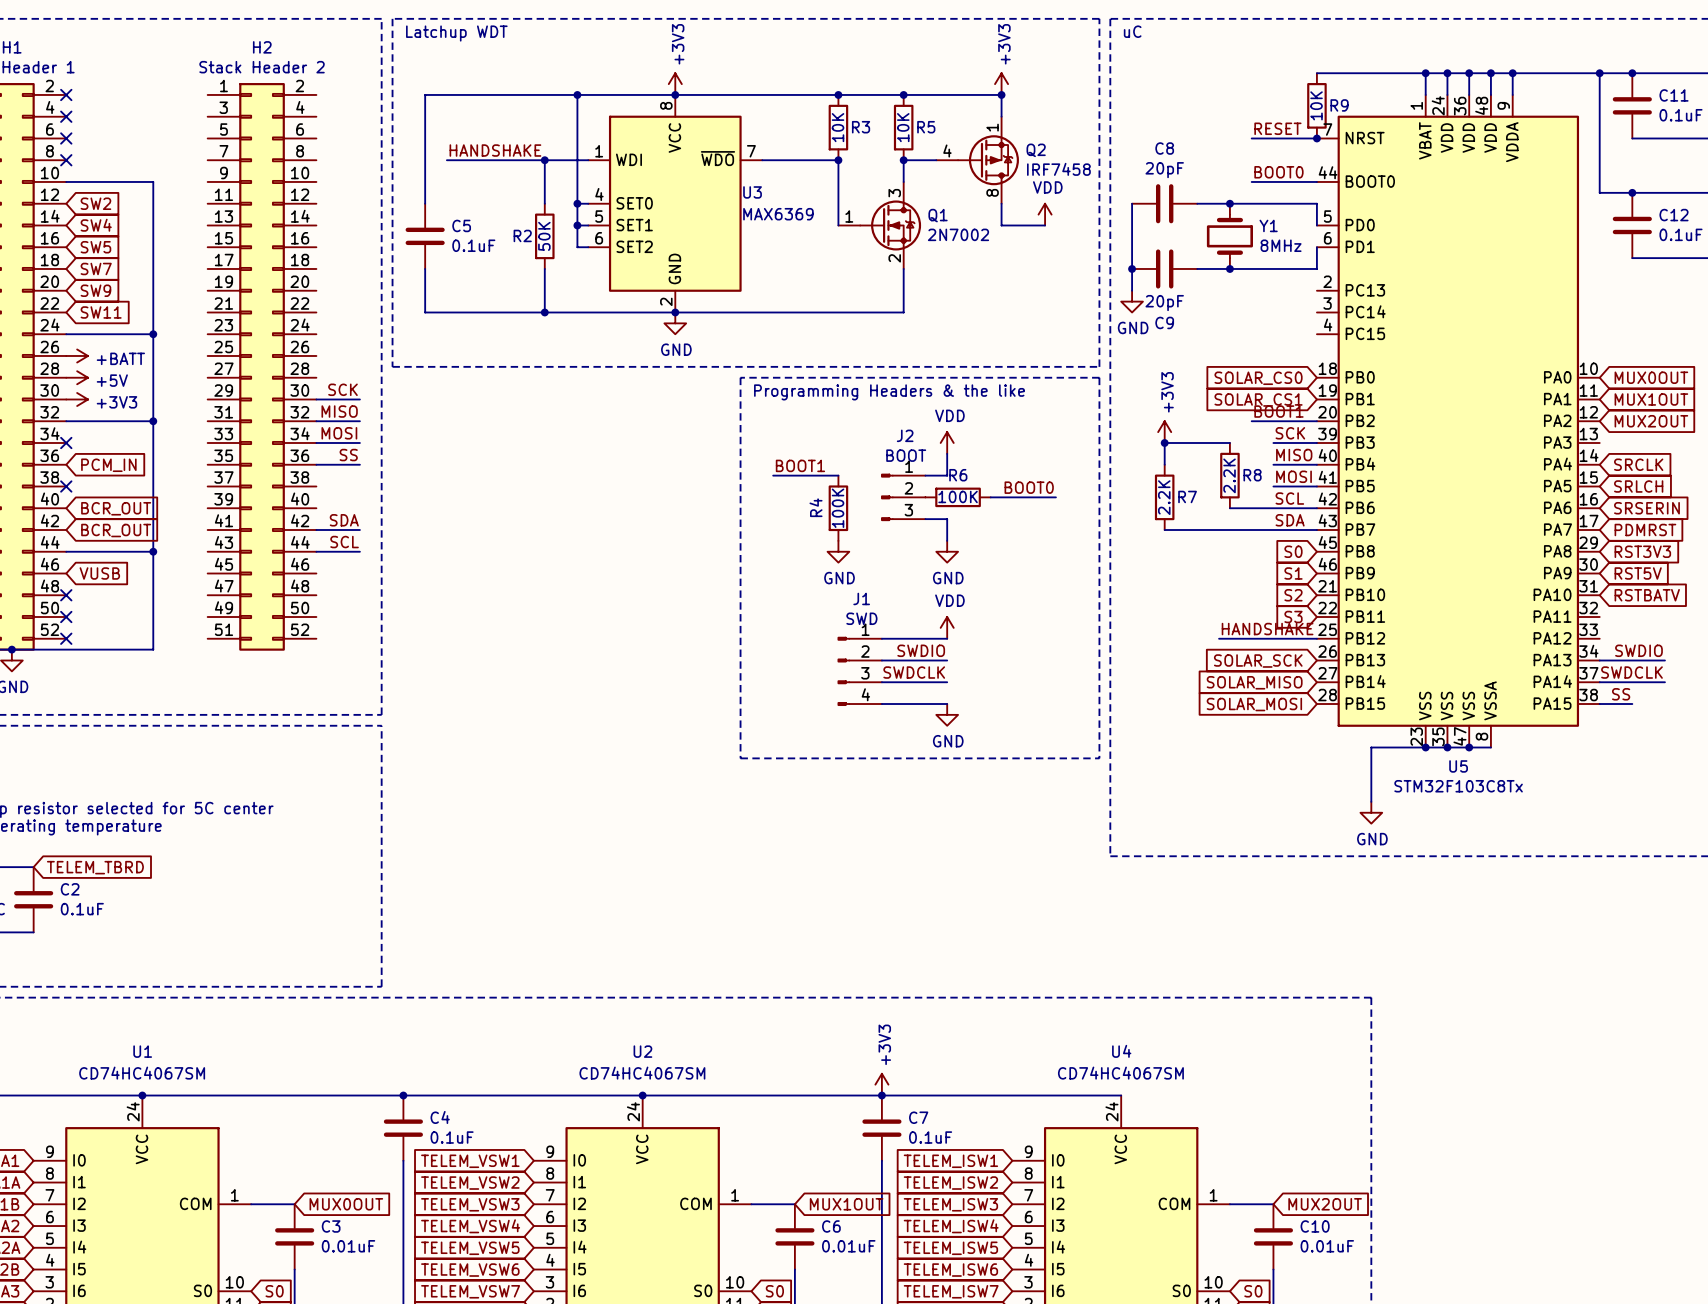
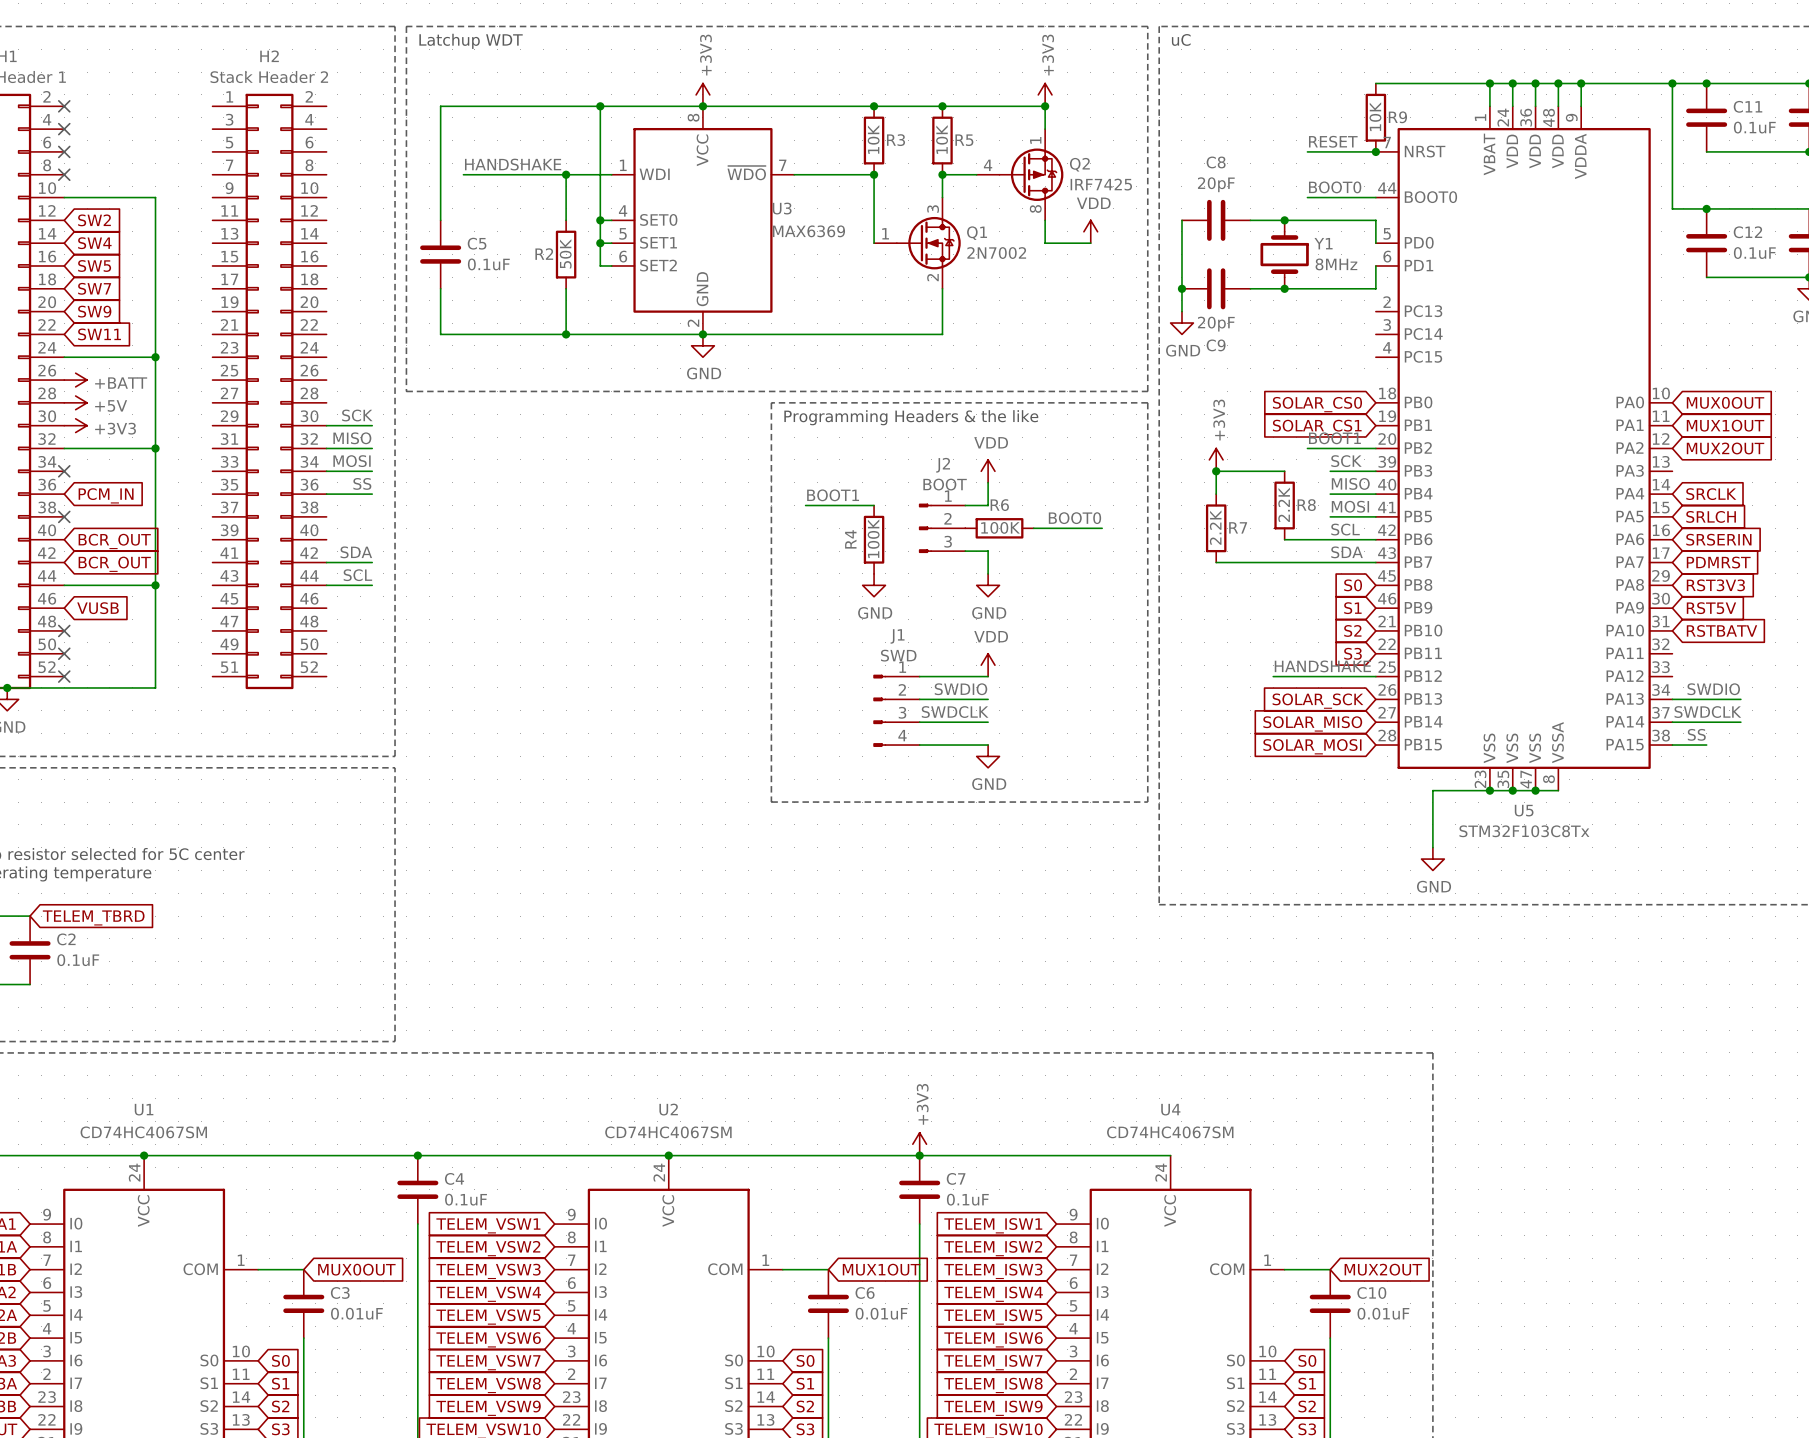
Q2 value: IRF7458 (1058, 169) -> IRF7425 (1101, 184)

